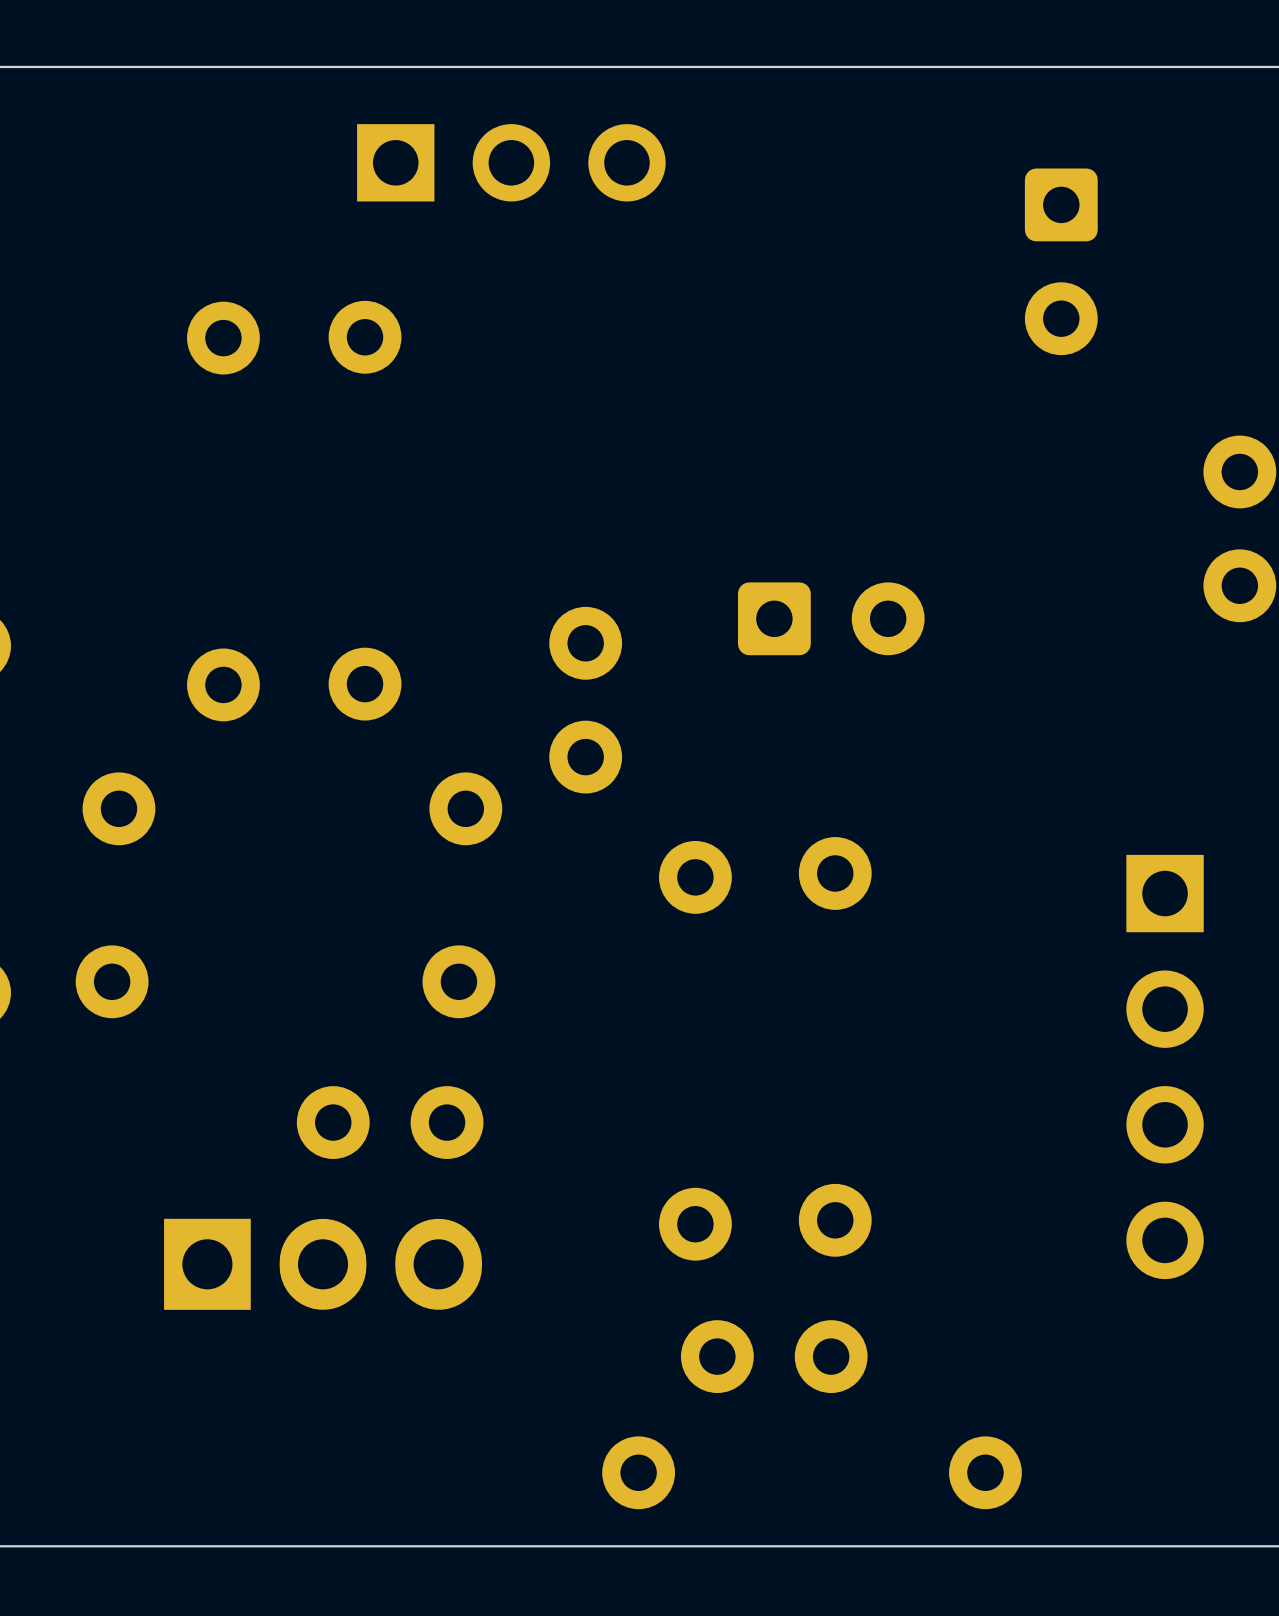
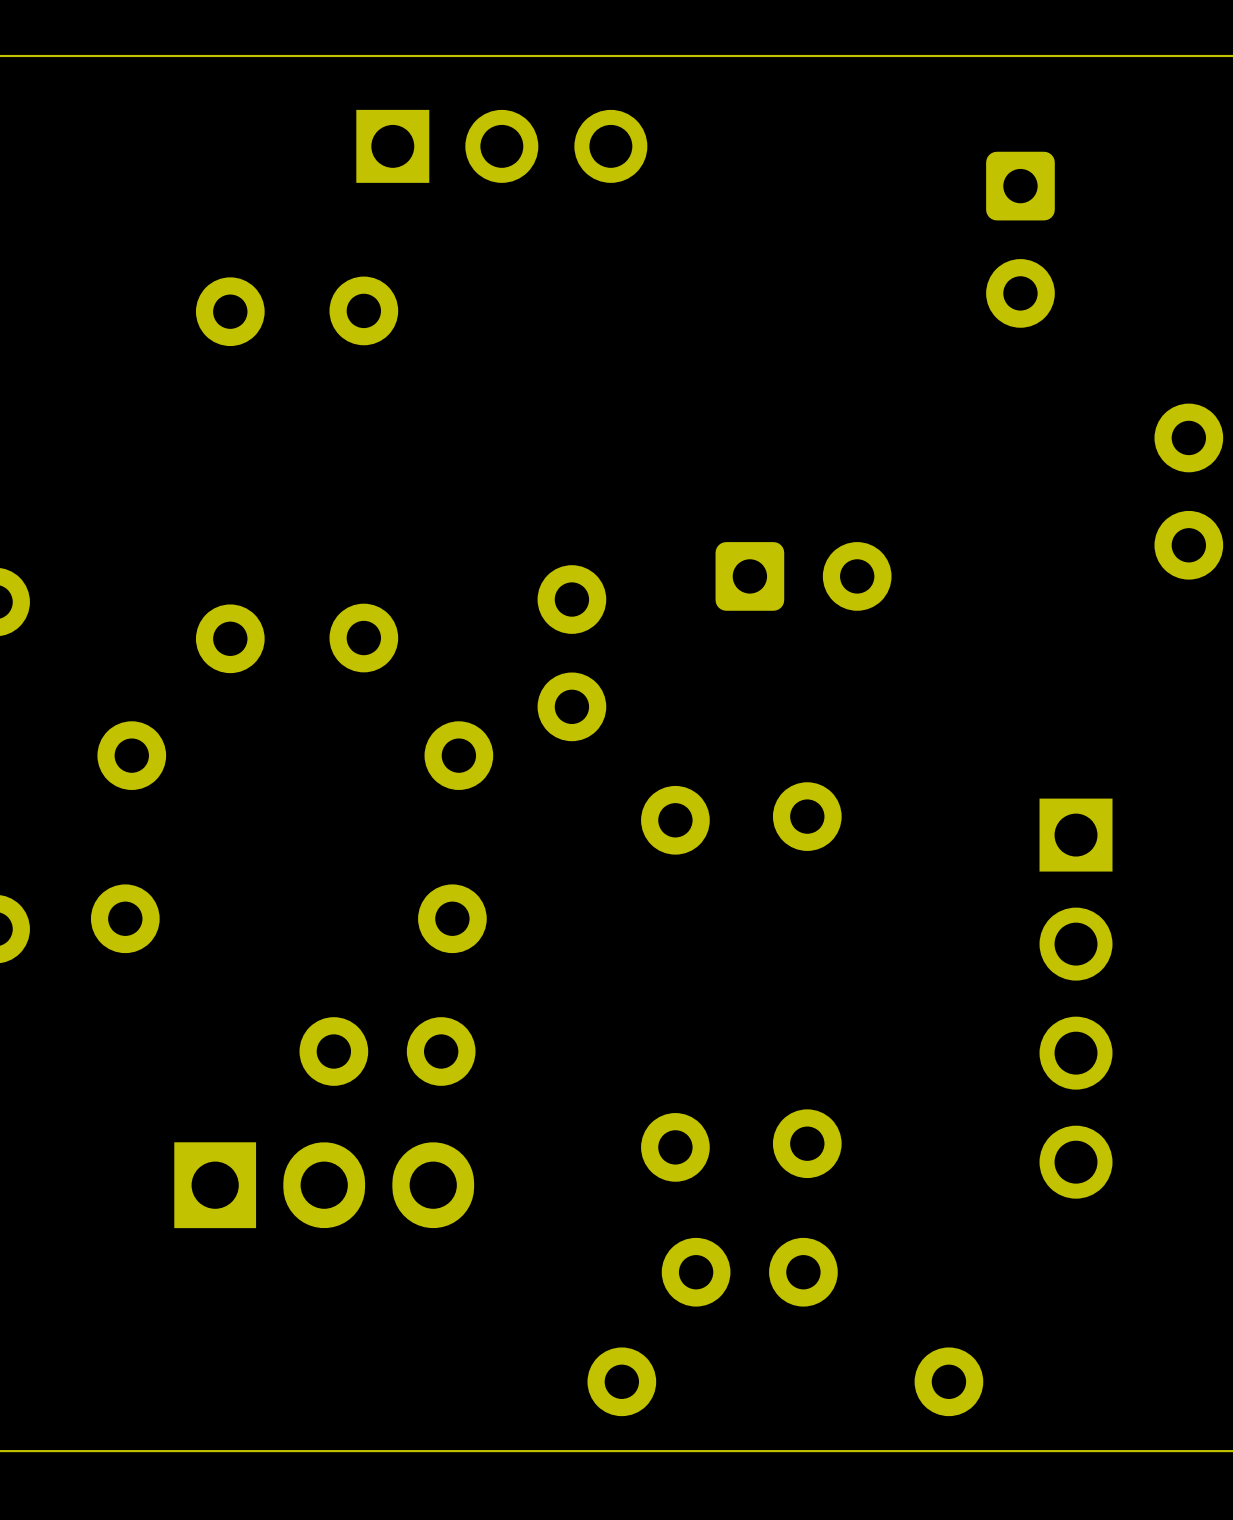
part position: (1165, 1066) -> (1076, 998)

